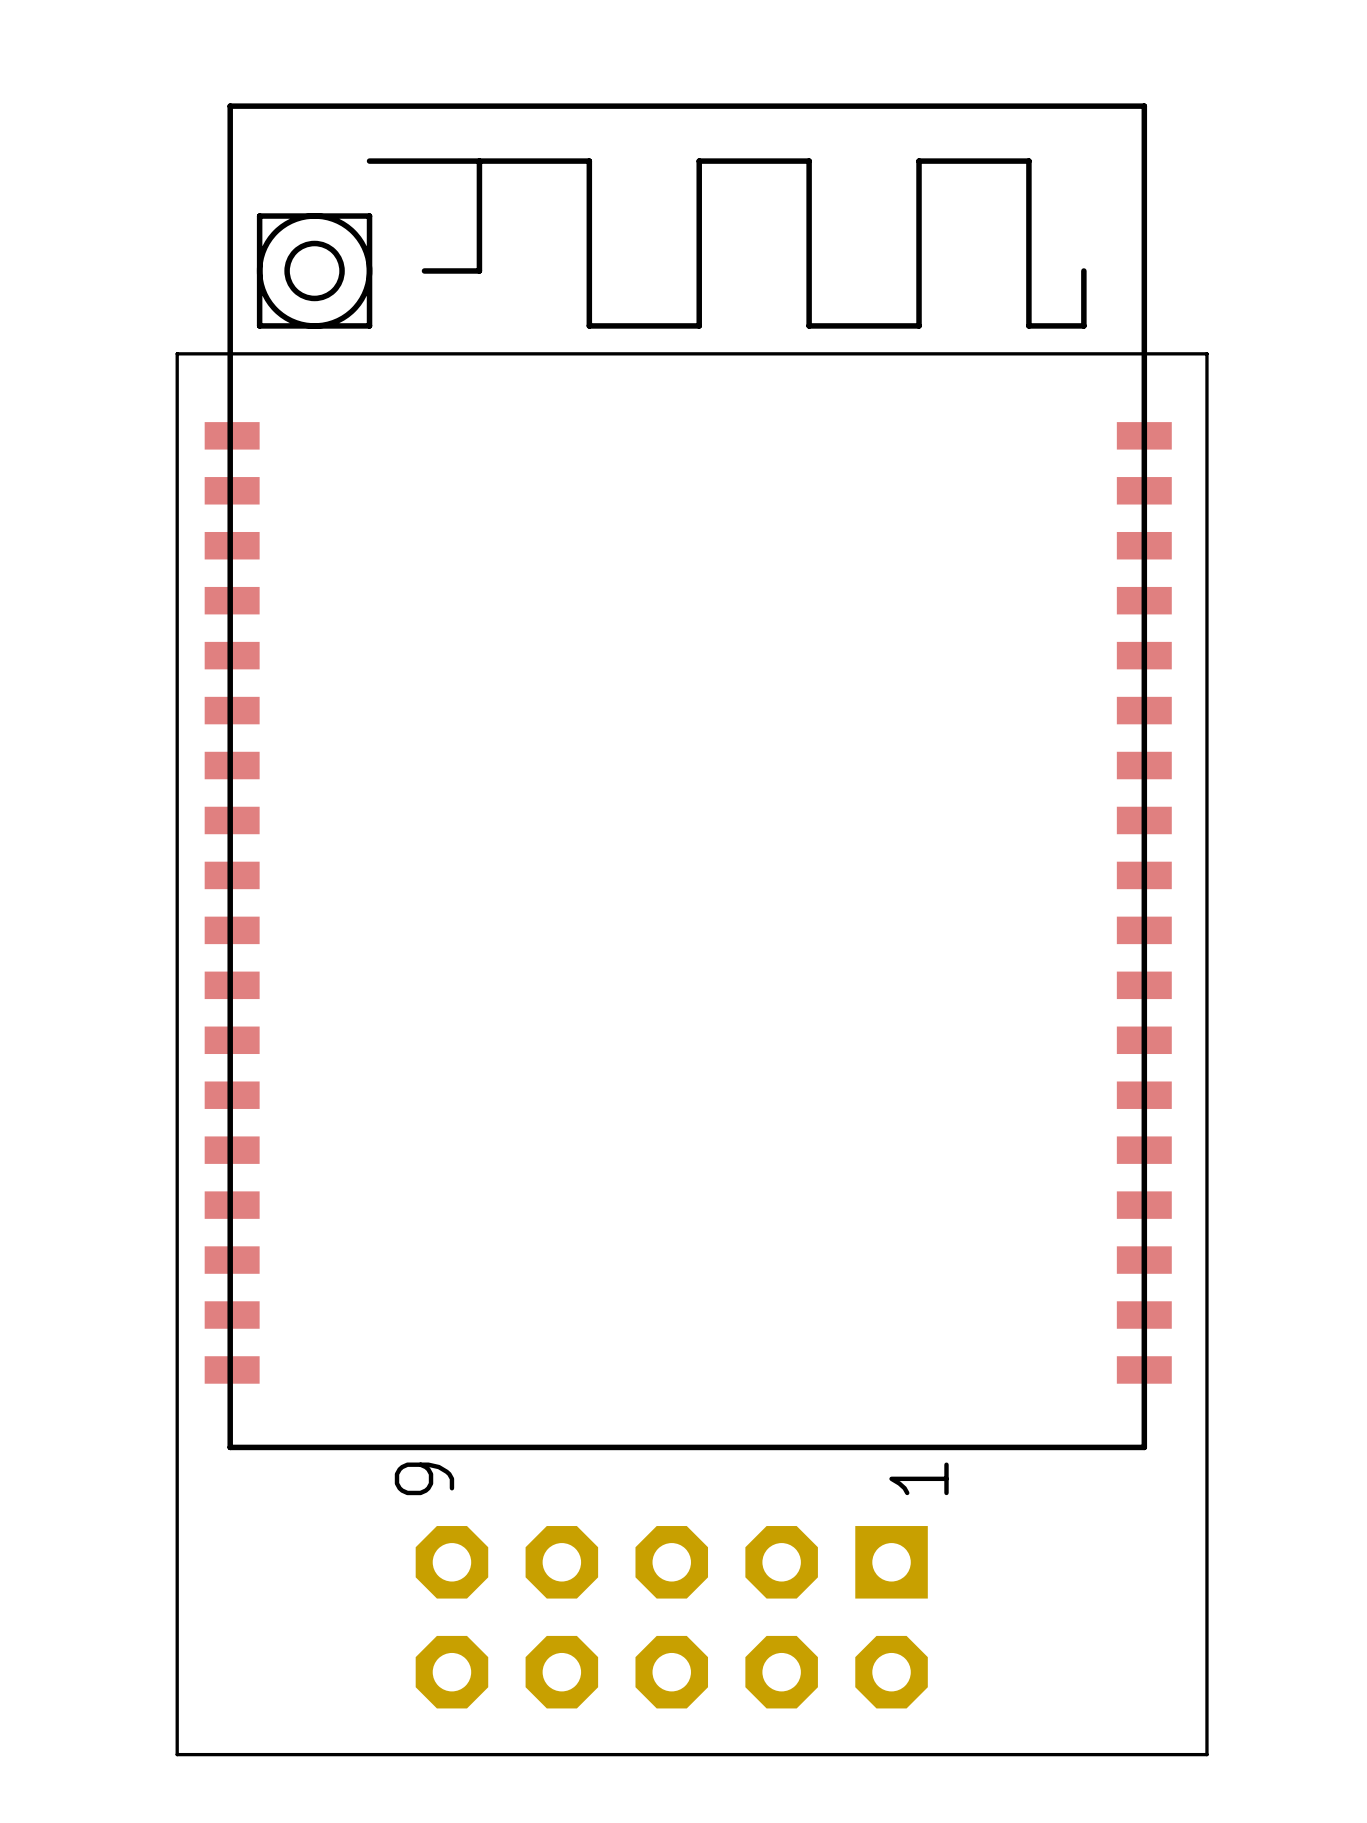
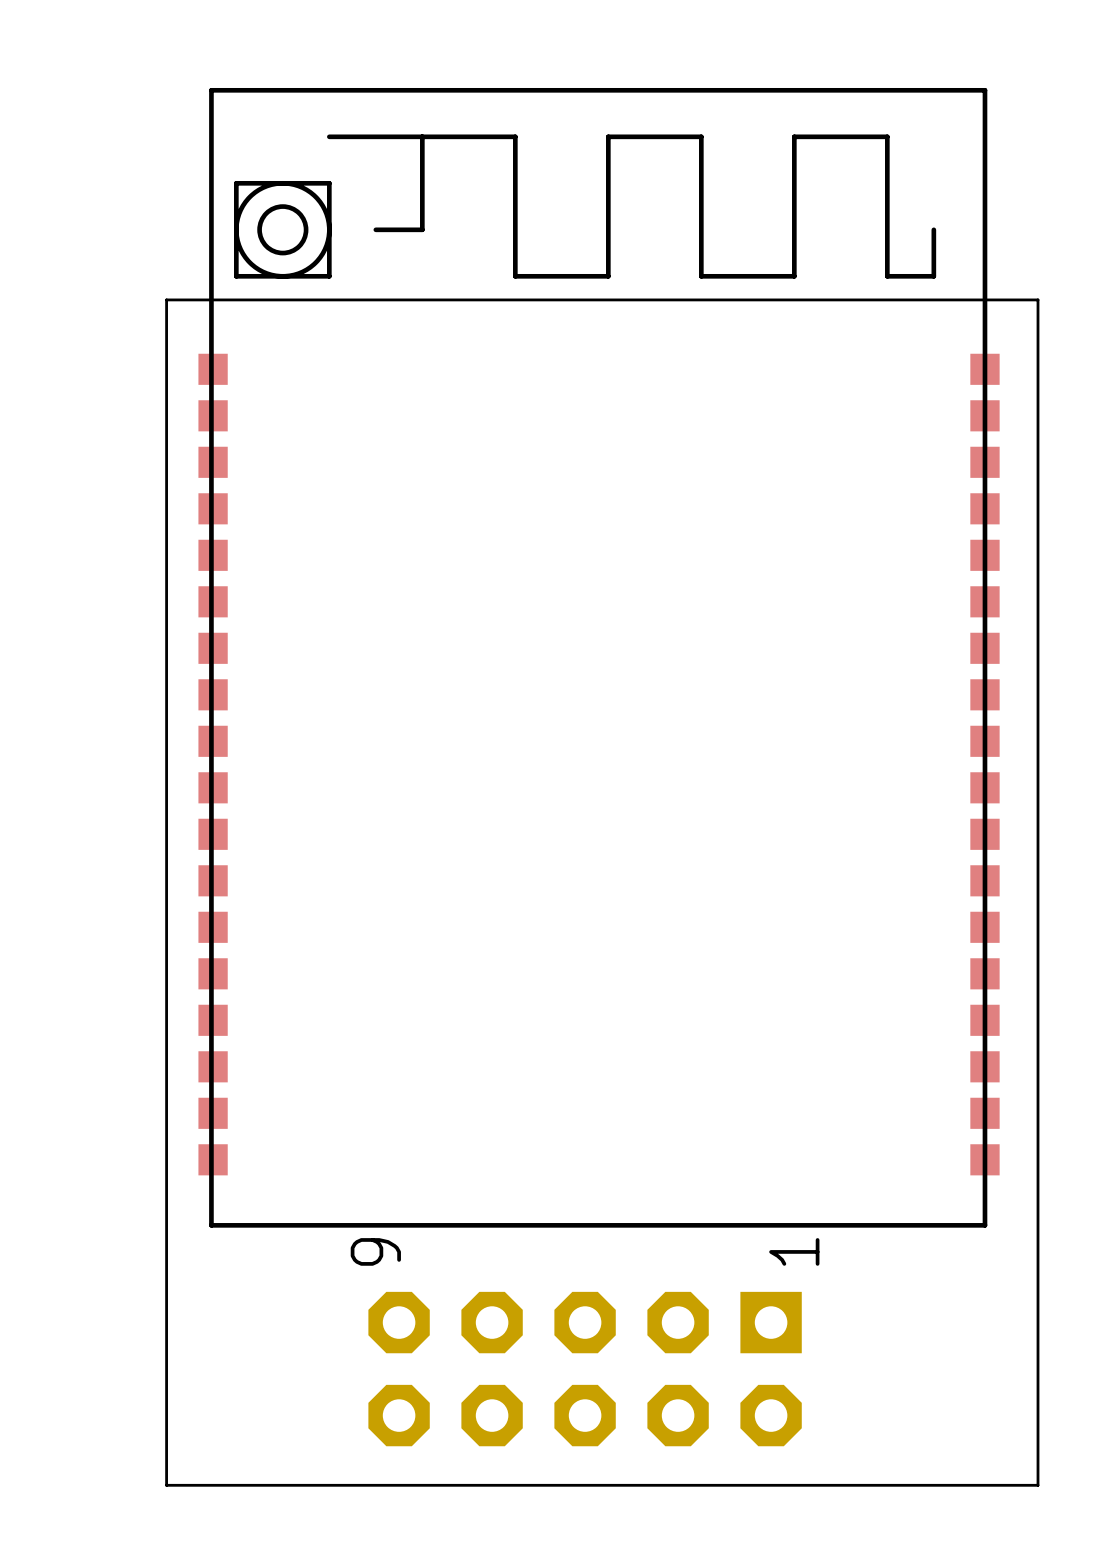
part footprint: [204, 103, 1172, 1451] -> [198, 87, 1000, 1228]

